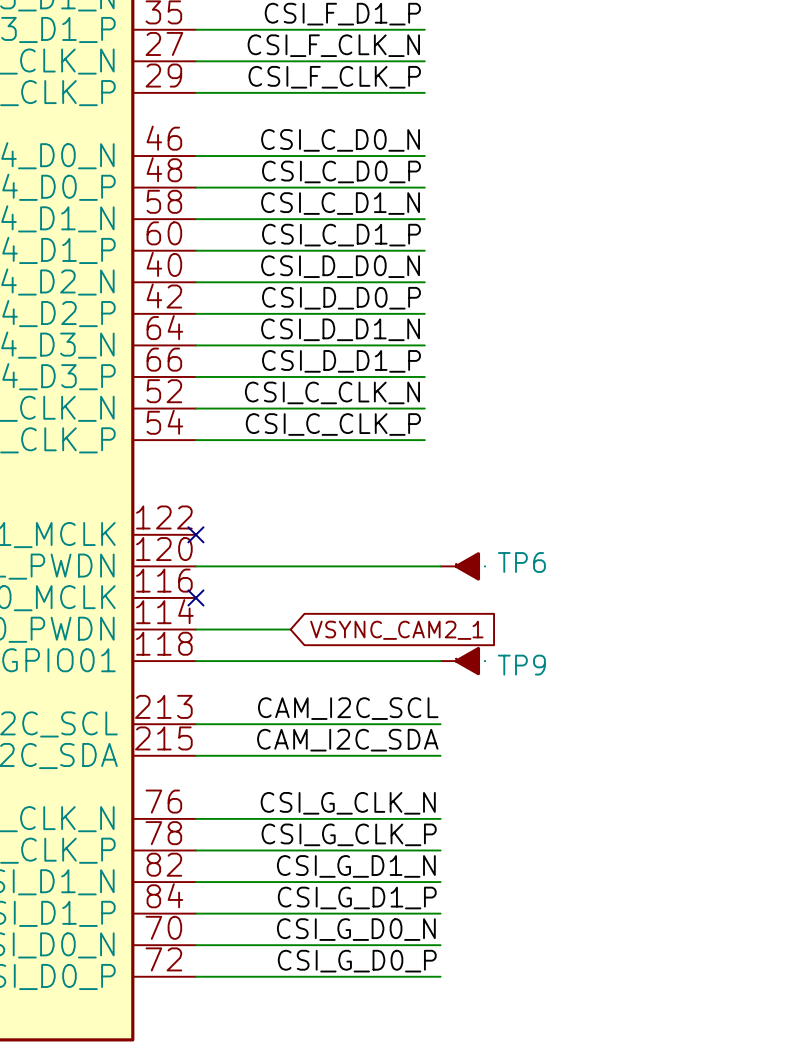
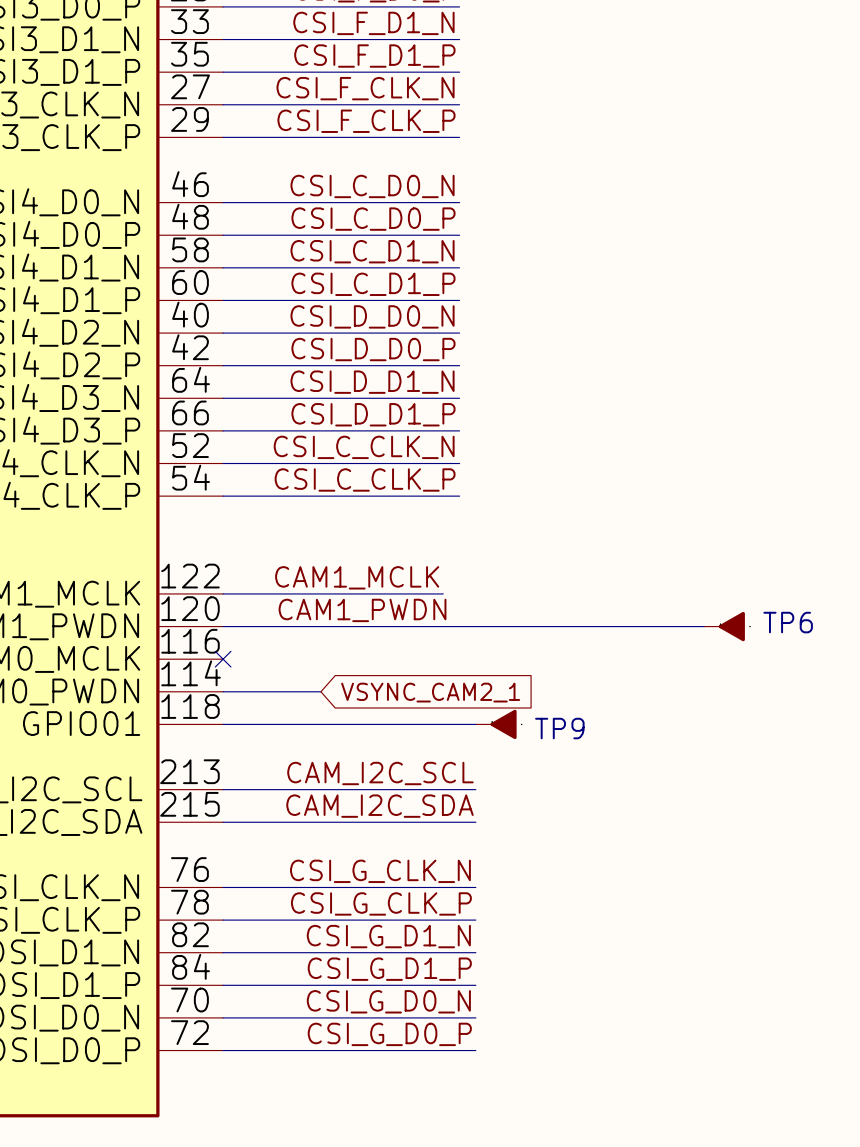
label: none -> CAM1_MCLK (357, 577)
wire: none -> (223, 593) (443, 593)
no-connect mark: (195, 534) -> none
label: none -> CAM1_PWDN (362, 610)
wire: none -> (475, 626) (704, 626)
TP6 position: (460, 566) -> (724, 626)

